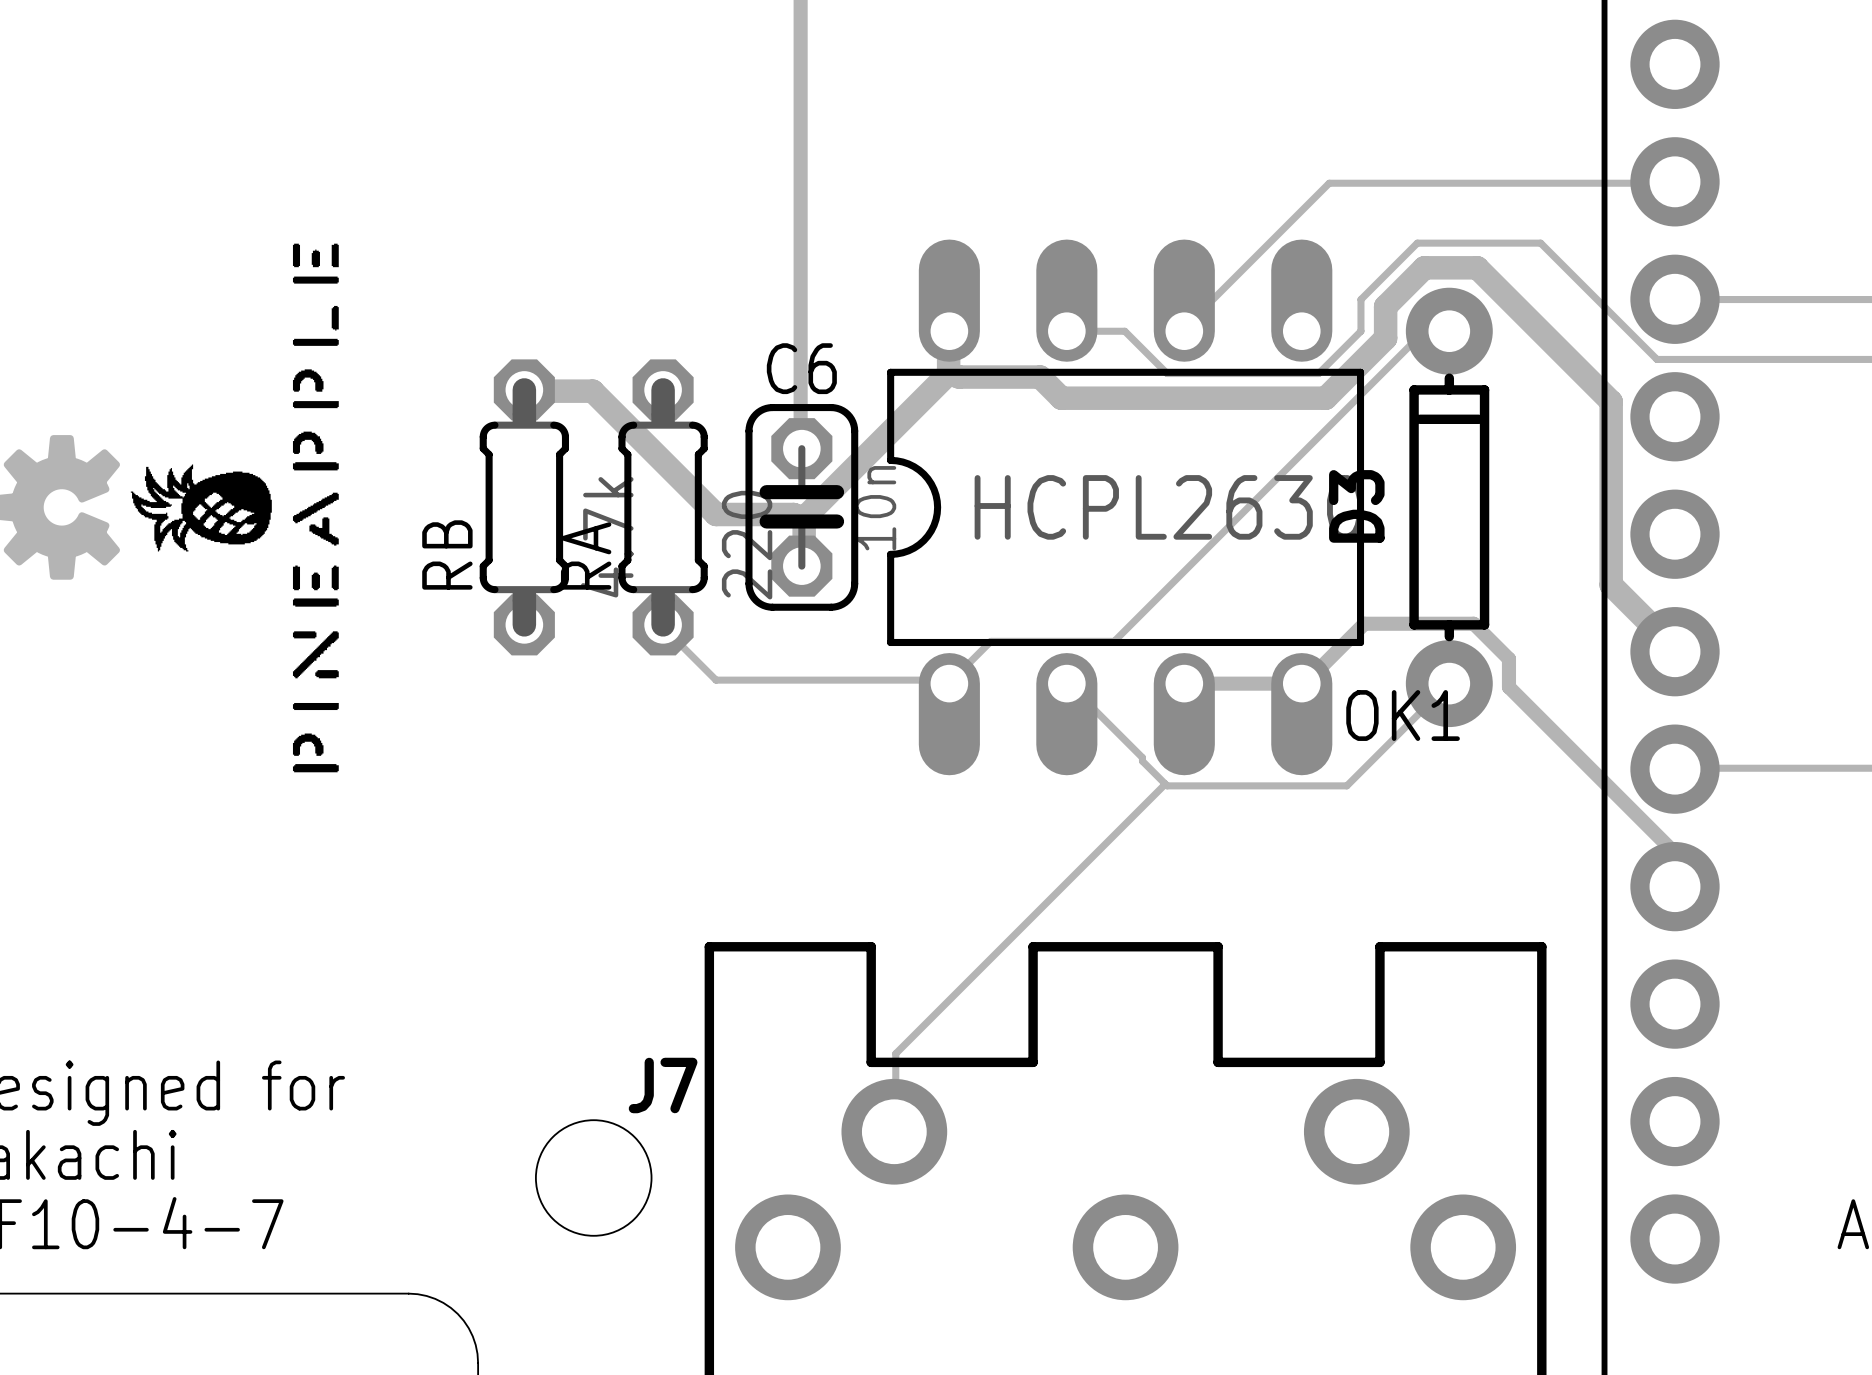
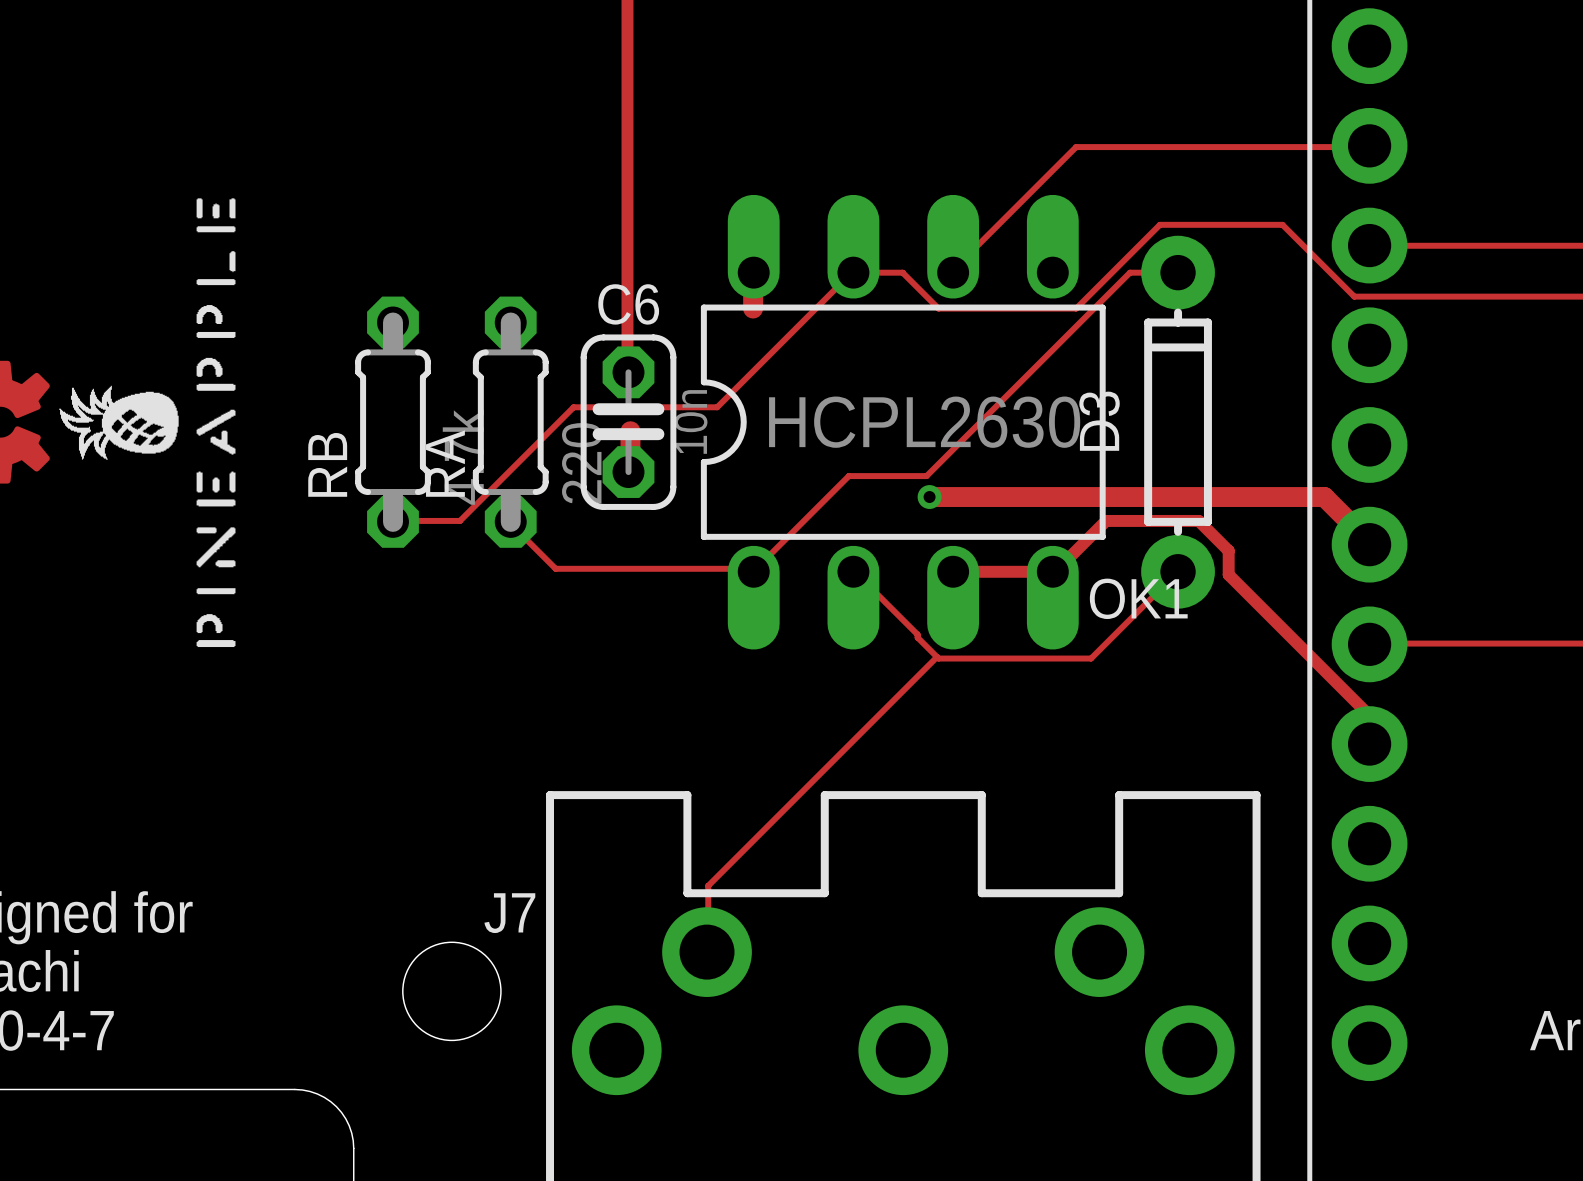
track: (1572, 274) (1540, 243) (1417, 243) (1360, 299) (1360, 331) (1318, 373) -> (1282, 224) (1159, 224) (1076, 308) (1067, 308)
track: none -> (853, 272) (717, 407) (573, 407) (459, 520) (393, 521)
track: (1424, 331) (1114, 641) (990, 641) -> (1073, 329) (926, 476) (848, 476) (789, 535)
track: (1385, 338) (1385, 306) (1424, 267) (1477, 267) (1611, 401) (1611, 584) (1621, 595) -> (1123, 278) (1129, 272) (1156, 272)
track width: thick (1385, 338) (1325, 398) -> thin (1123, 278) (1073, 329)
track: (524, 389) (592, 391) (716, 514) (793, 514) (804, 518) (948, 373) (959, 377) (1040, 377) (1061, 398) (1325, 398) -> none
track: none -> (929, 497) (1324, 497)
via: none -> (929, 497)

